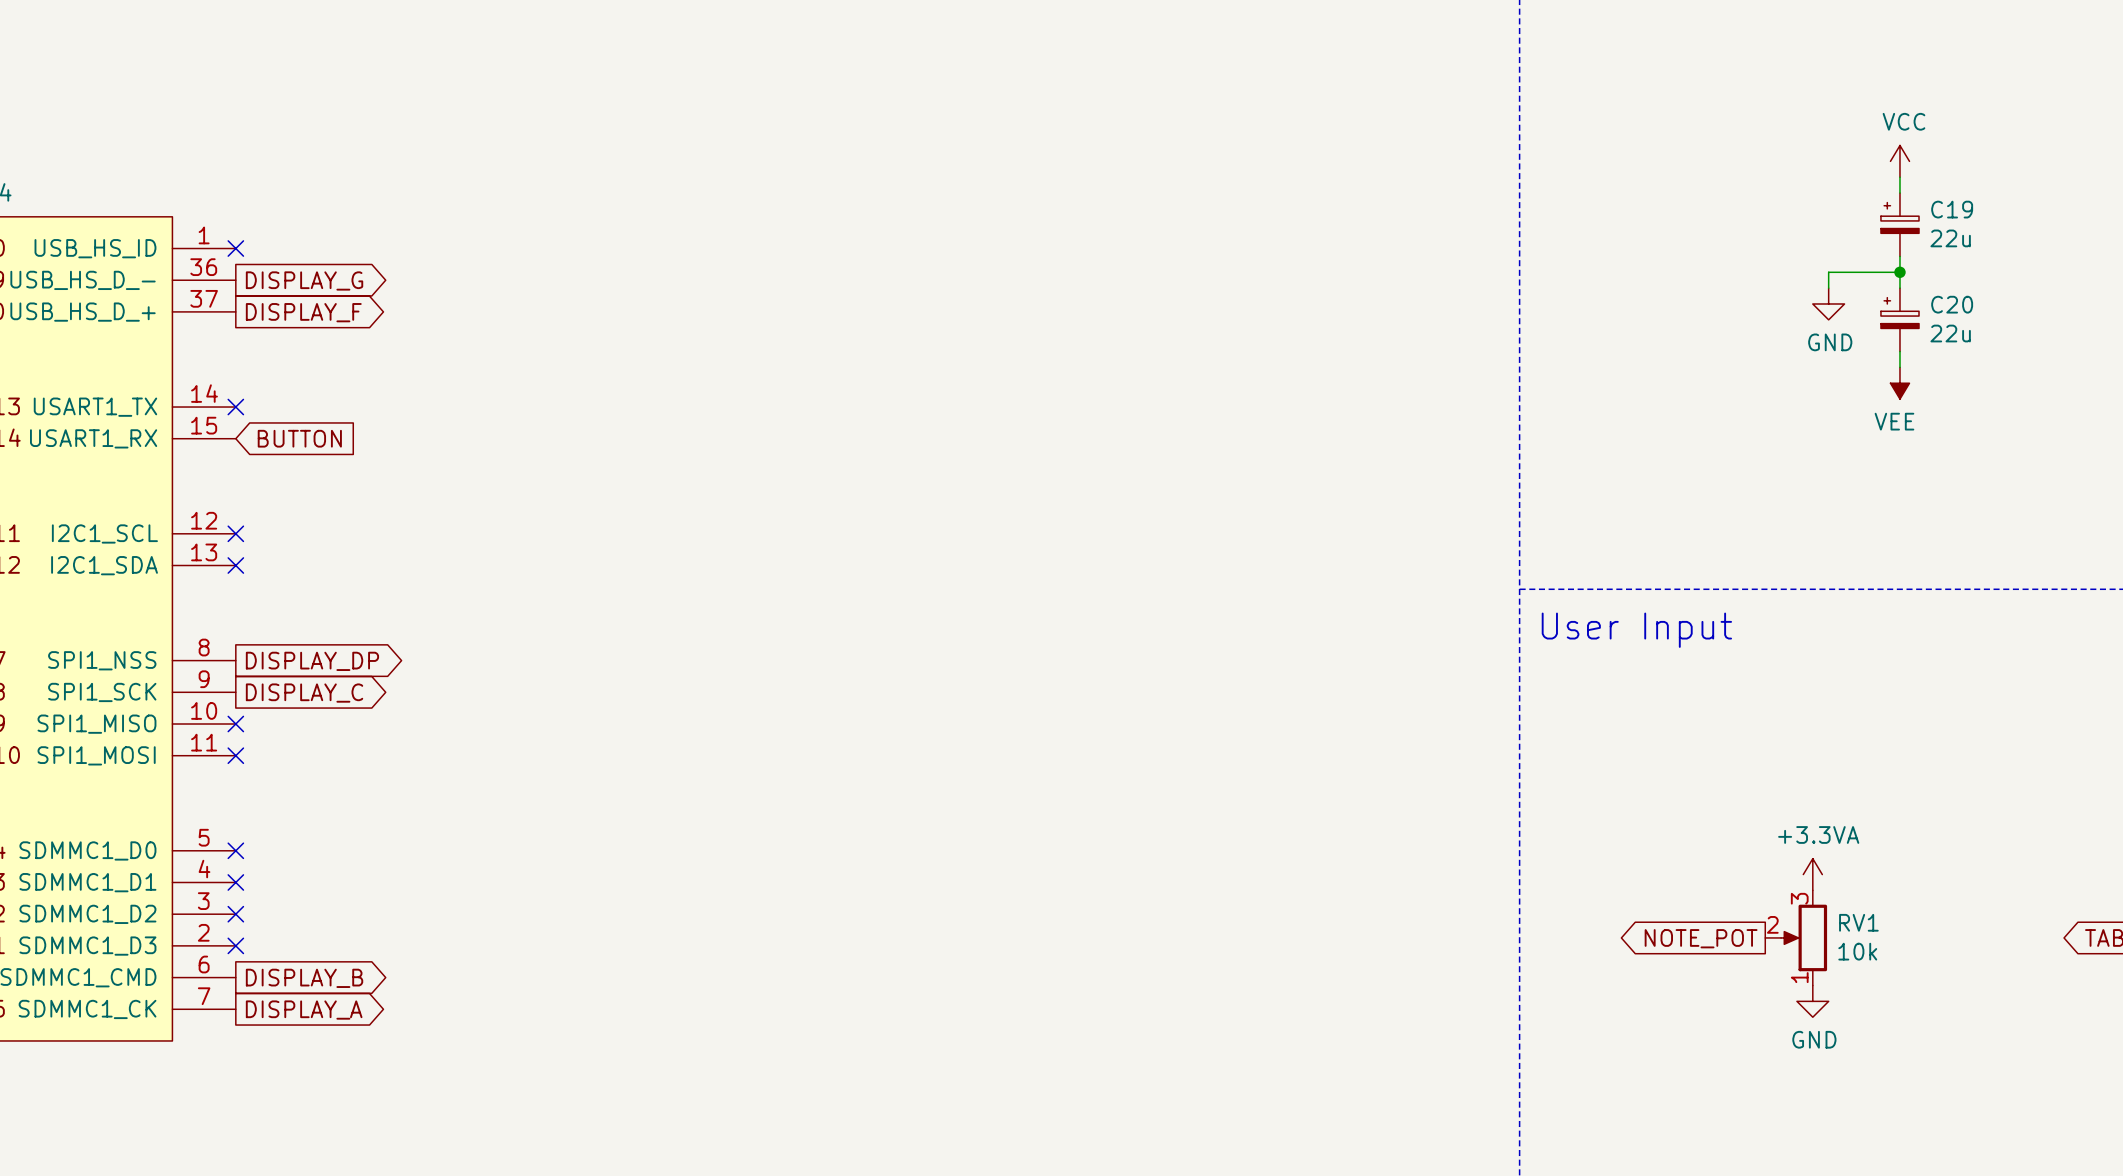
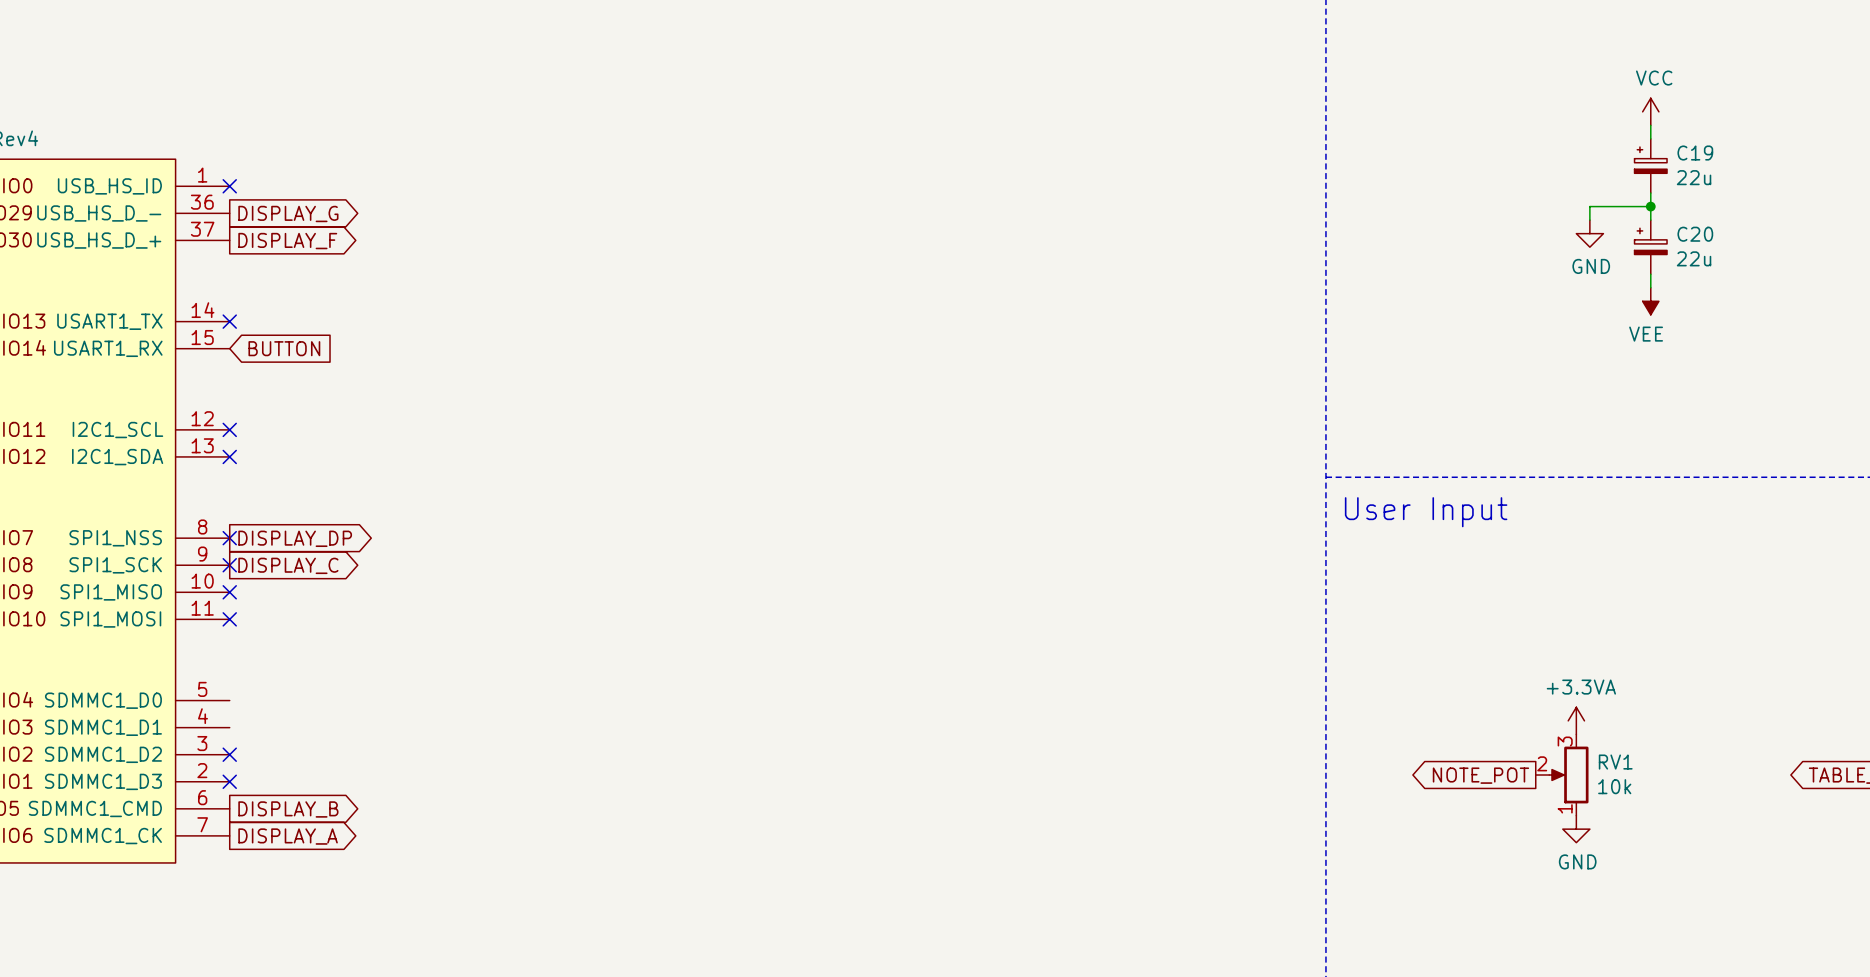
no-connect mark: none -> (229, 538)
no-connect mark: none -> (229, 565)
no-connect mark: (235, 850) -> none
no-connect mark: (235, 882) -> none

